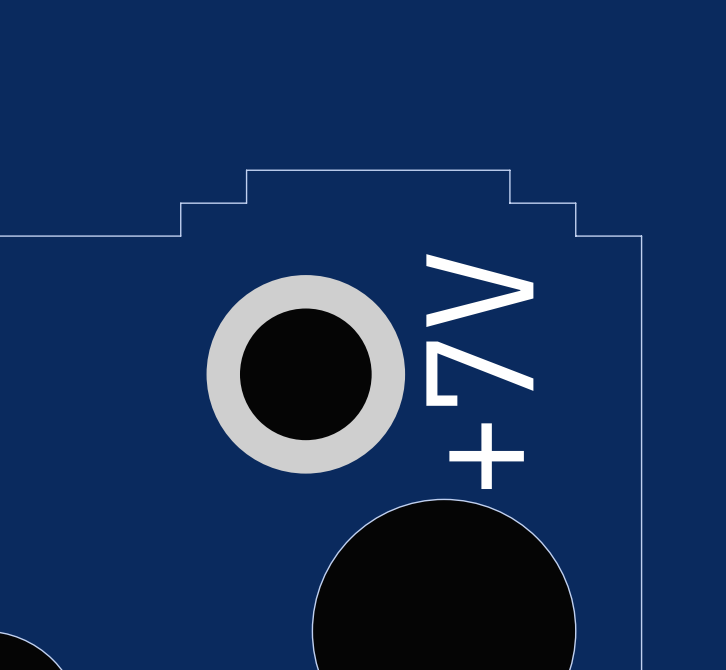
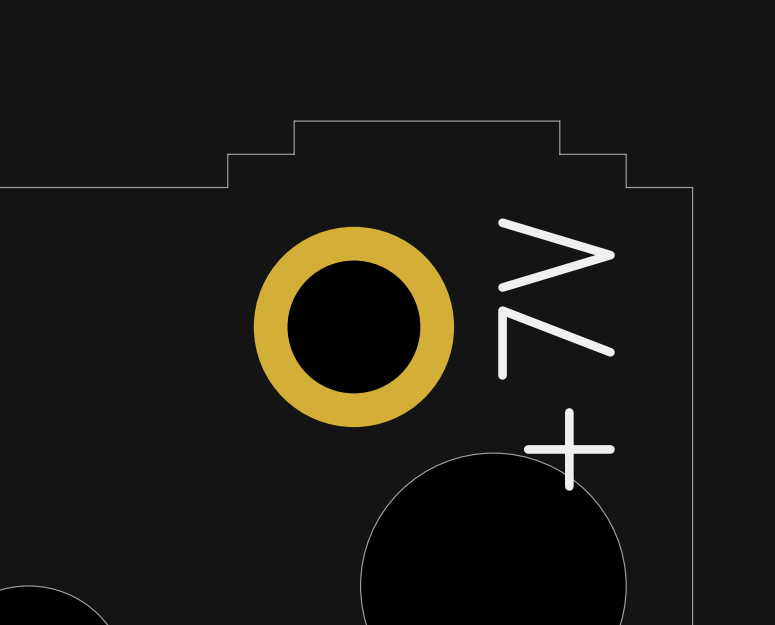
text position: +7V (479, 371) -> +7V (556, 354)

